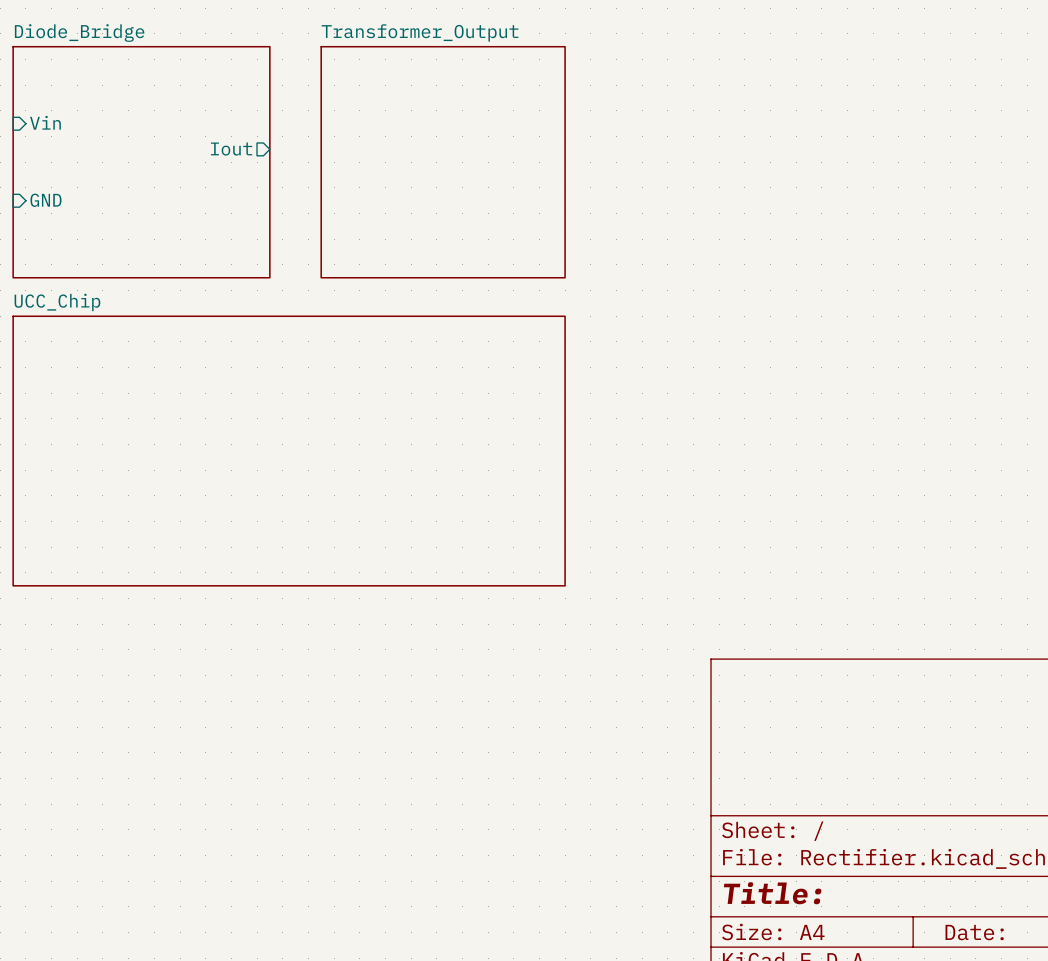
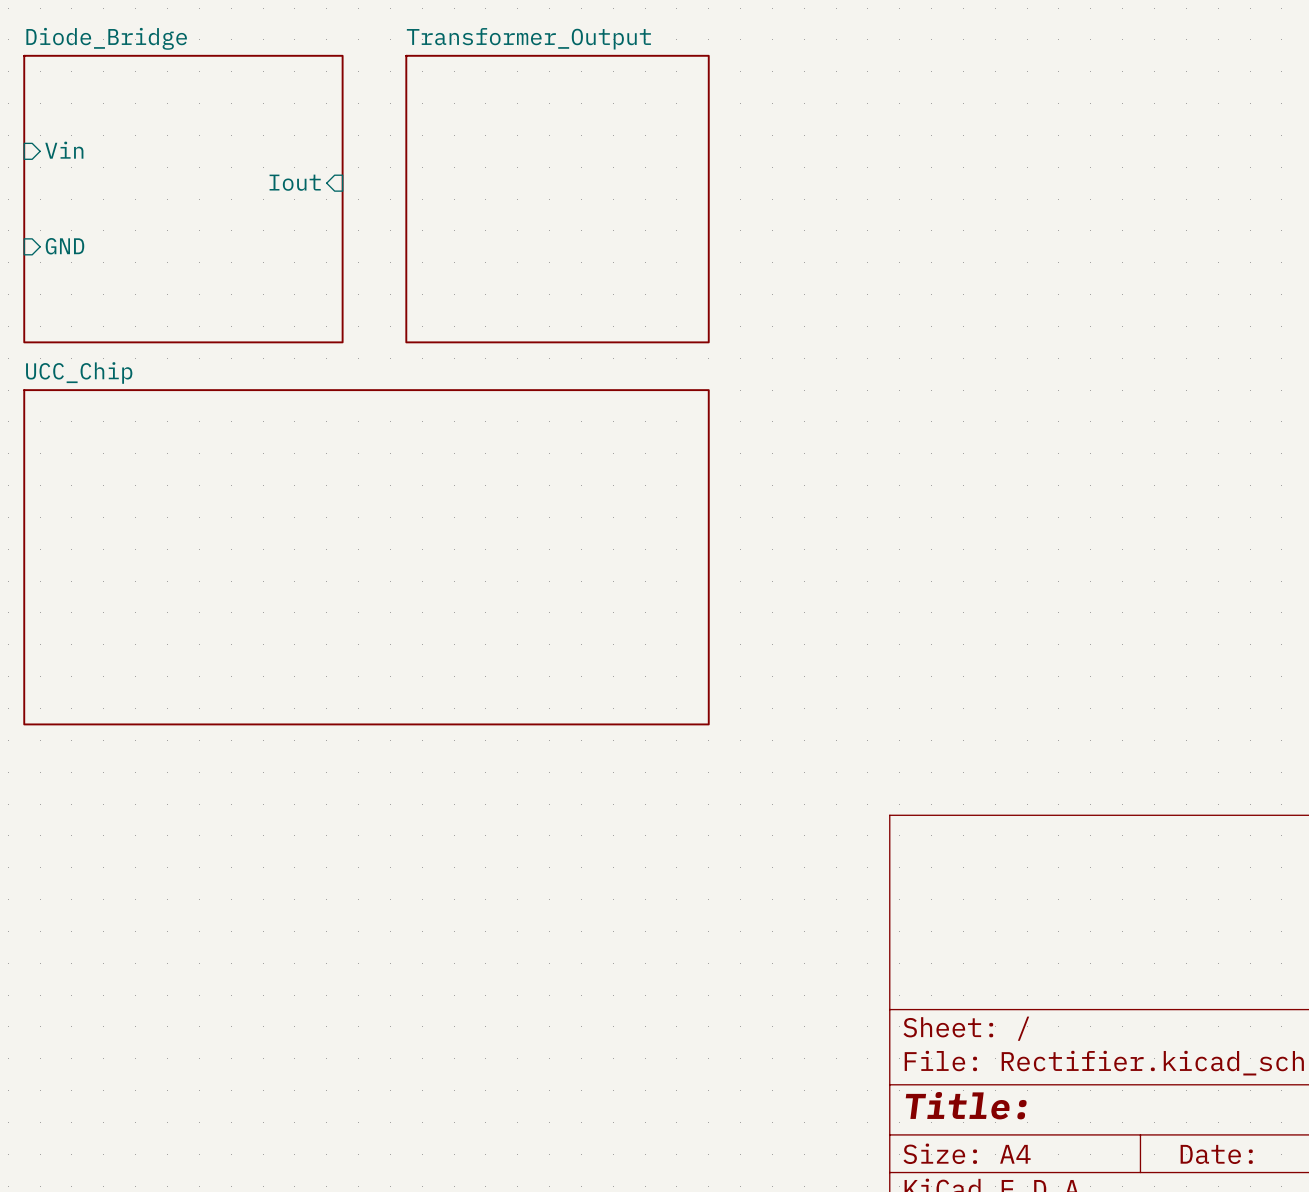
sheet pin shape: output (231, 149) -> input (295, 182)

